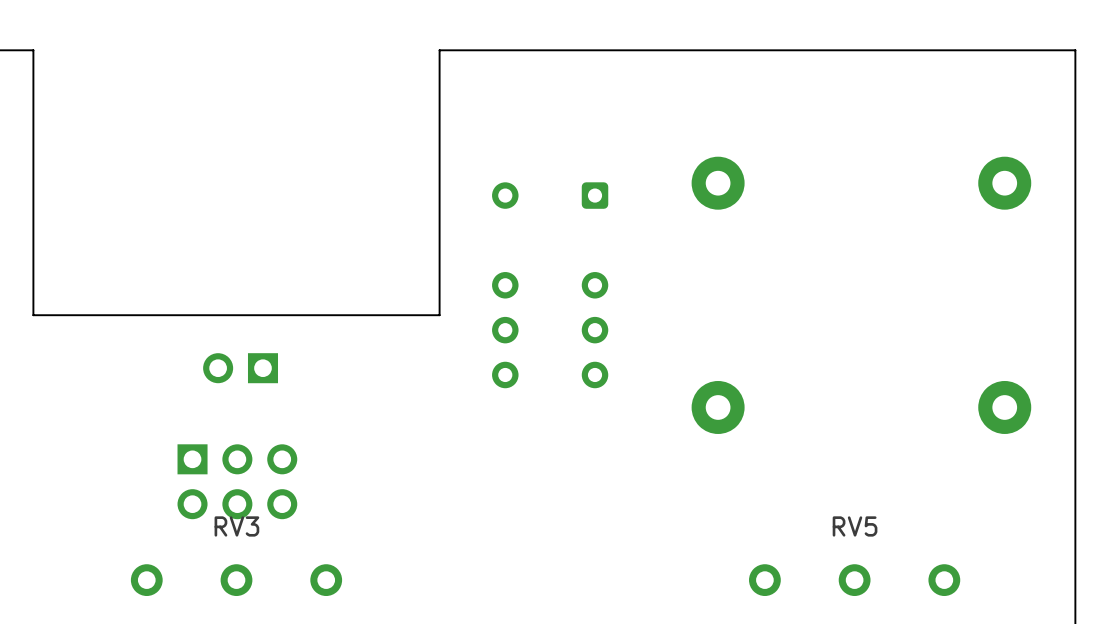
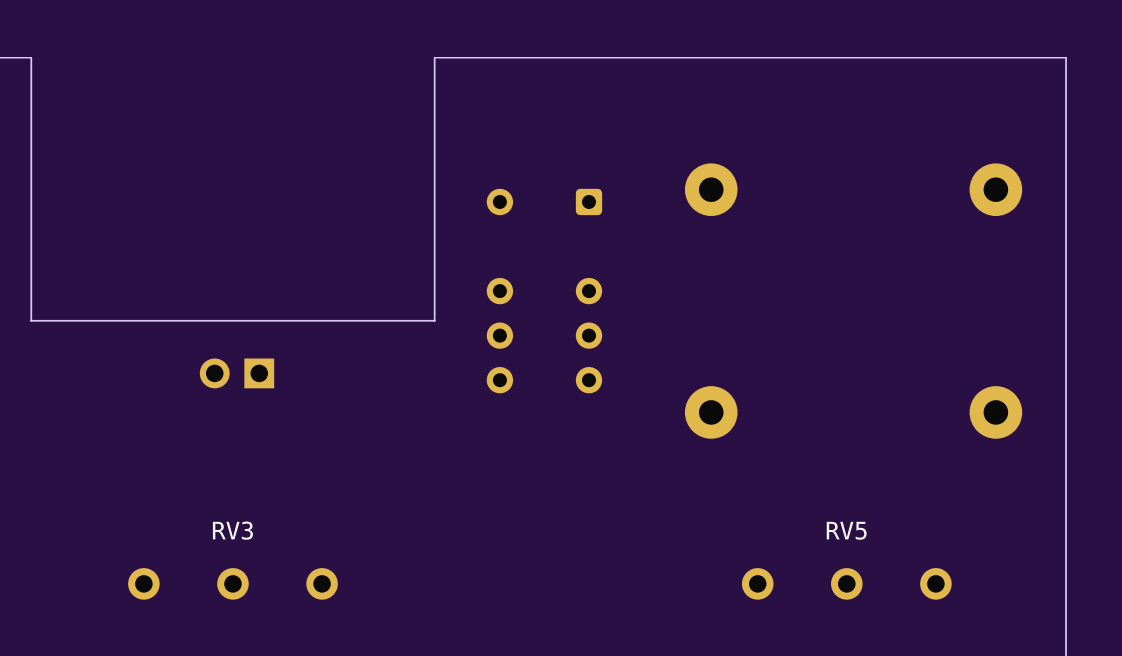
part: (237, 481) -> none

